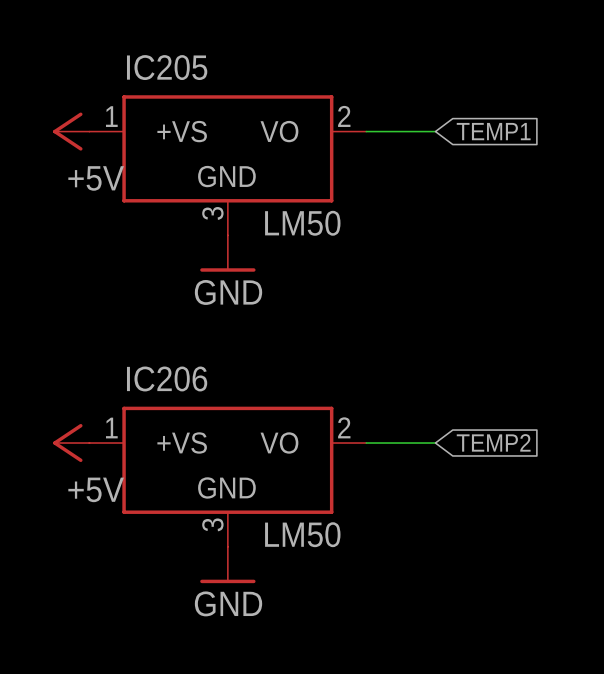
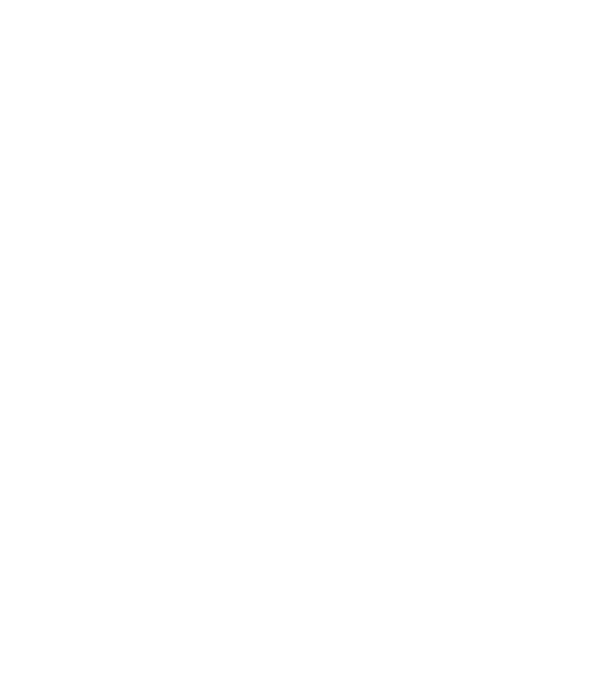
power symbol: +5V (71, 131) -> none
wire: (366, 131) (435, 131) -> none
global label: TEMP1 (493, 131) -> none
IC205: LM50 (227, 165) -> none
power symbol: GND (227, 253) -> none
global label: TEMP2 (493, 442) -> none
power symbol: +5V (71, 443) -> none
wire: (366, 443) (435, 443) -> none
IC206: LM50 (227, 476) -> none
power symbol: GND (227, 564) -> none

